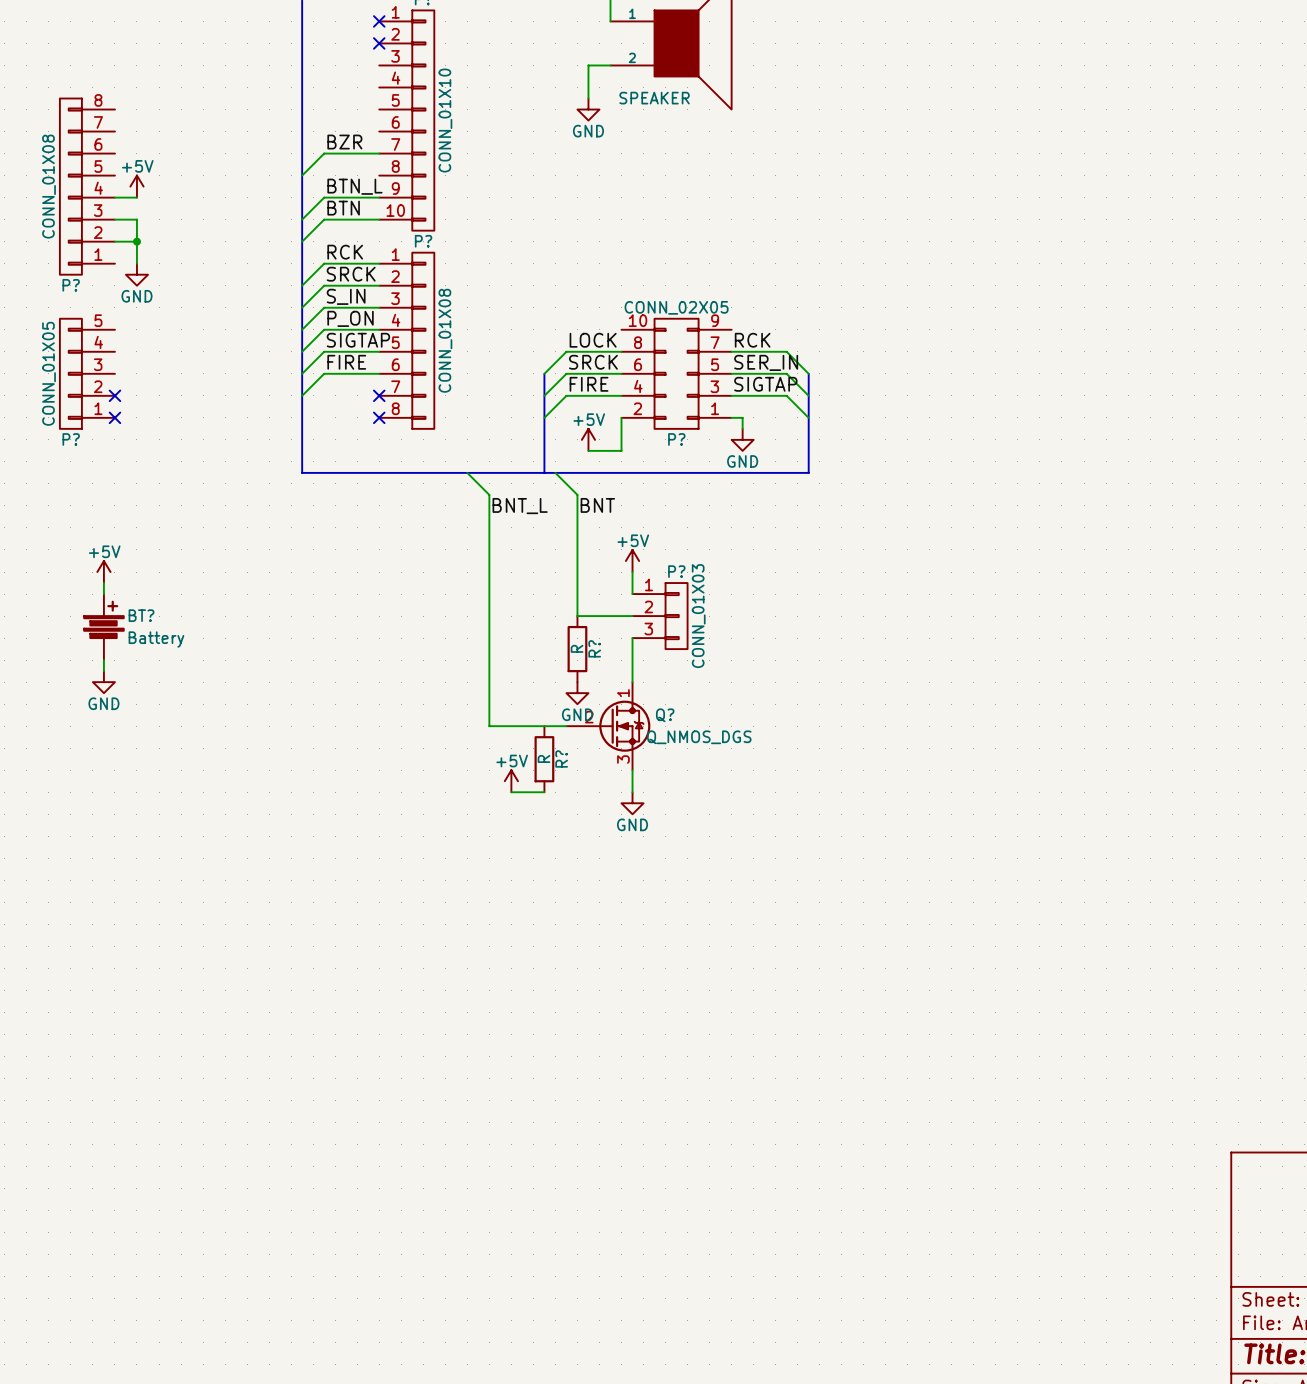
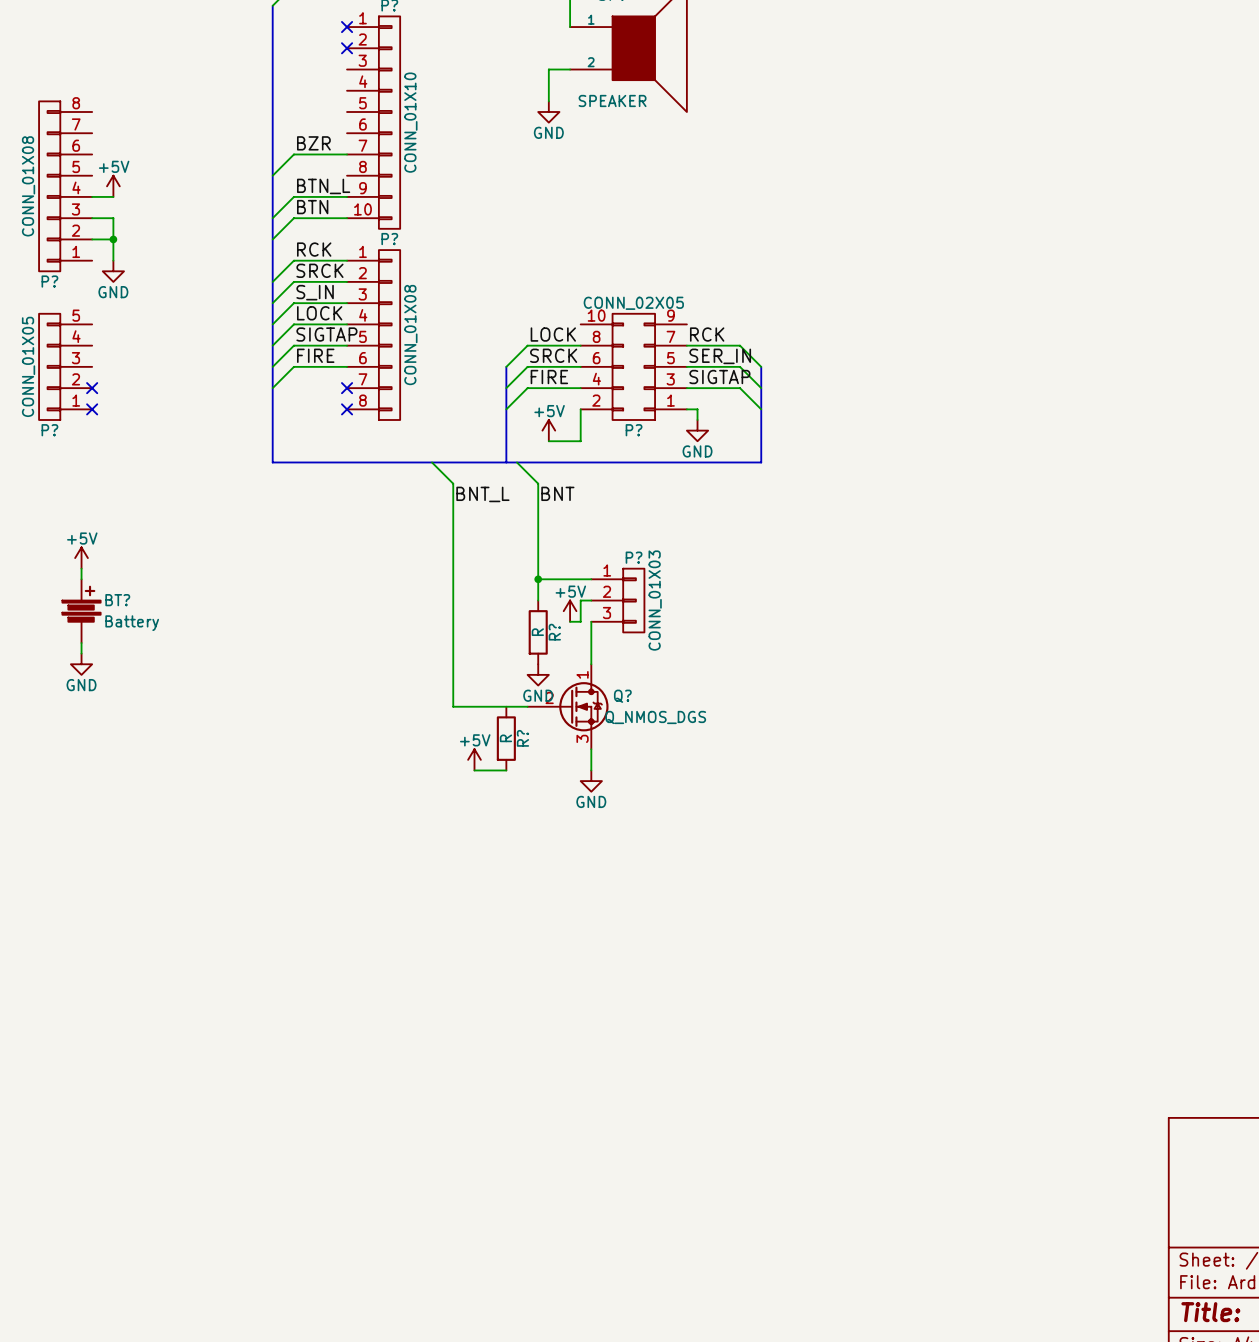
label: P_ON (350, 318) -> LOCK (319, 313)
power symbol position: +5V (632, 561) -> +5V (570, 611)
wire: (632, 572) (632, 594) -> (538, 579) (591, 579)
junction: none -> (538, 579)
wire: (577, 616) (621, 616) -> (570, 621) (580, 621) (580, 600)

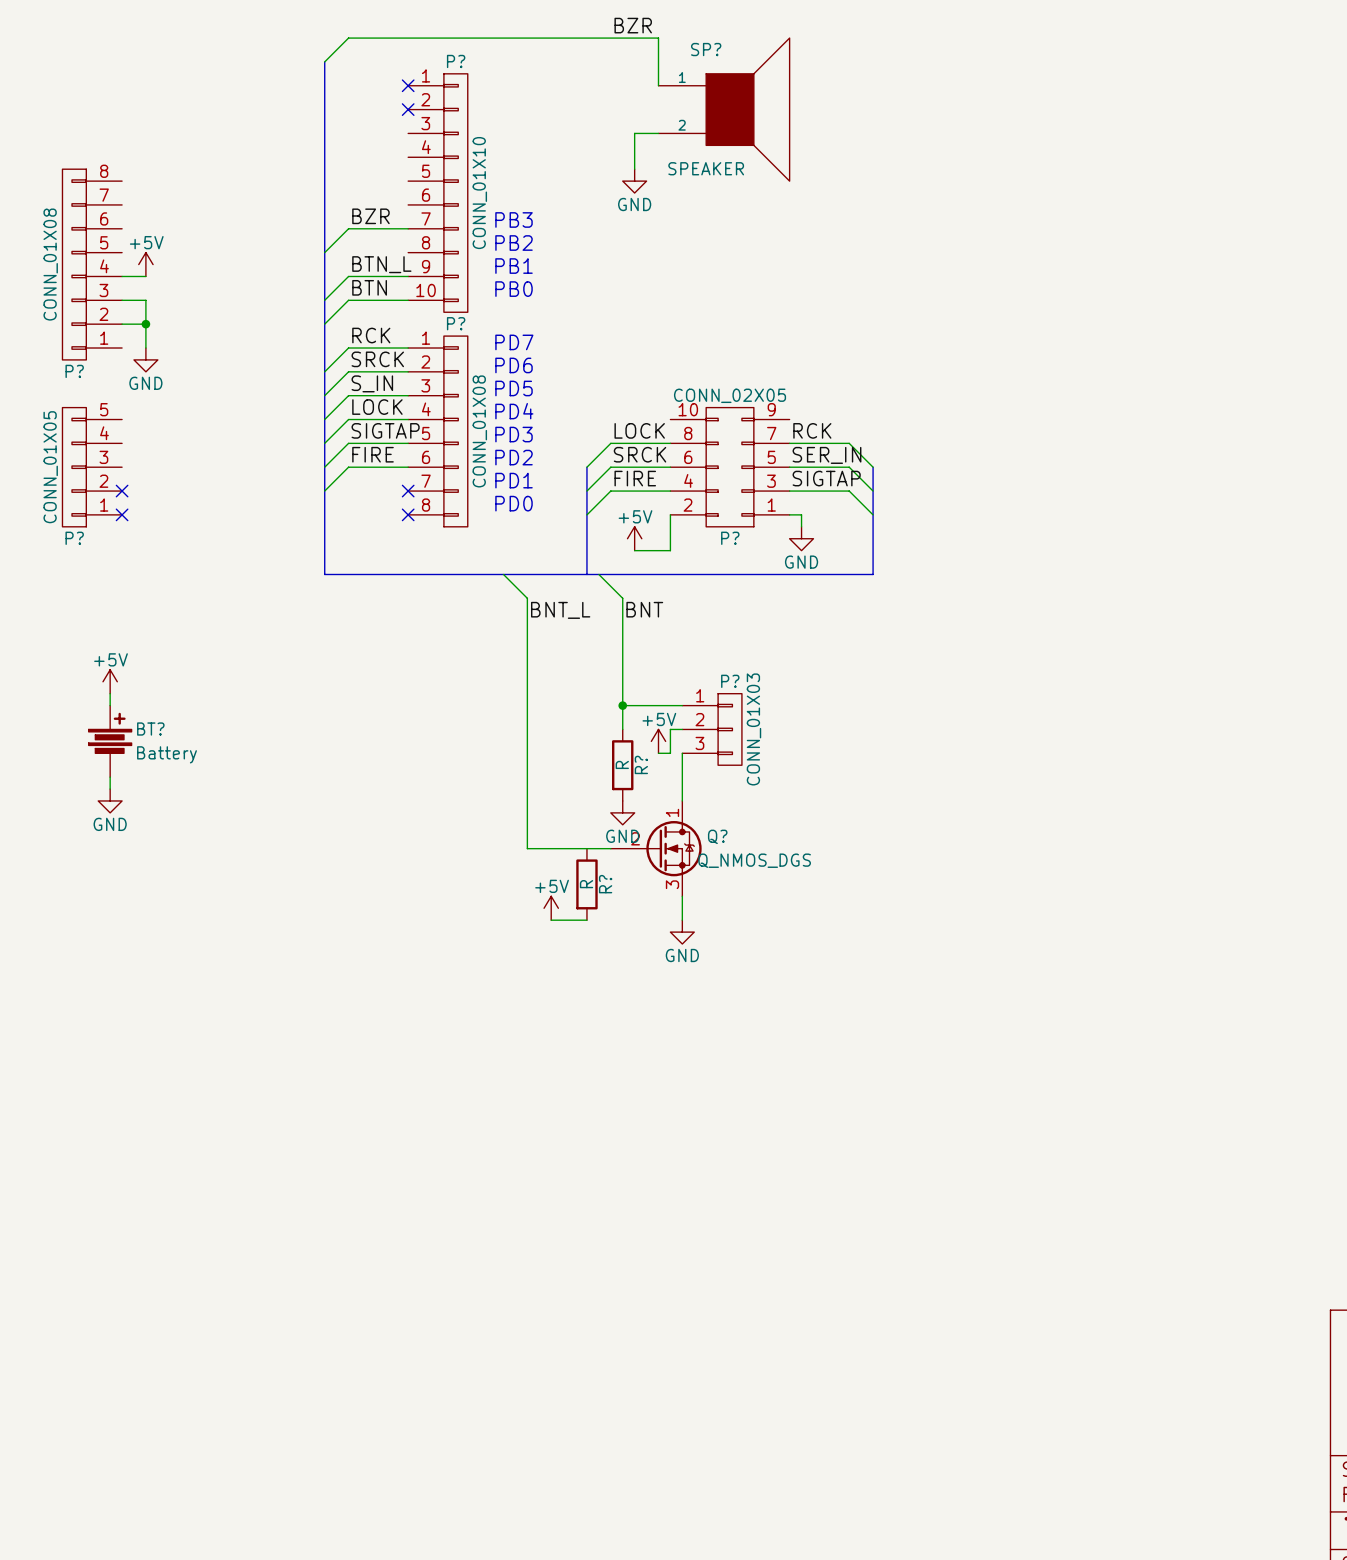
text: none -> PB3 (514, 219)
text: none -> PB2 (514, 243)
text: none -> PB1 (514, 266)
text: none -> PB0 (514, 289)
text: none -> PD7 (514, 342)
text: none -> PD6 (514, 365)
text: none -> PD5 (514, 388)
text: none -> PD4 (514, 411)
text: none -> PD3 (514, 434)
text: none -> PD2 (514, 457)
text: none -> PD1 (514, 480)
text: none -> PD0 (514, 503)

